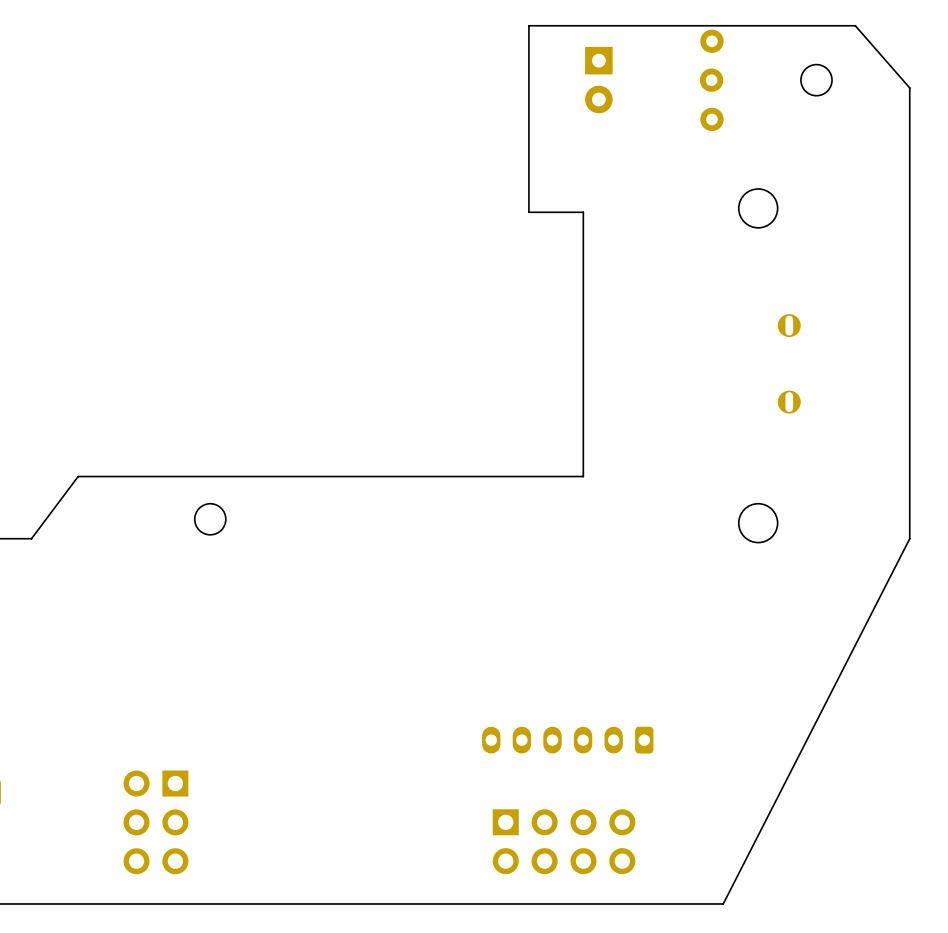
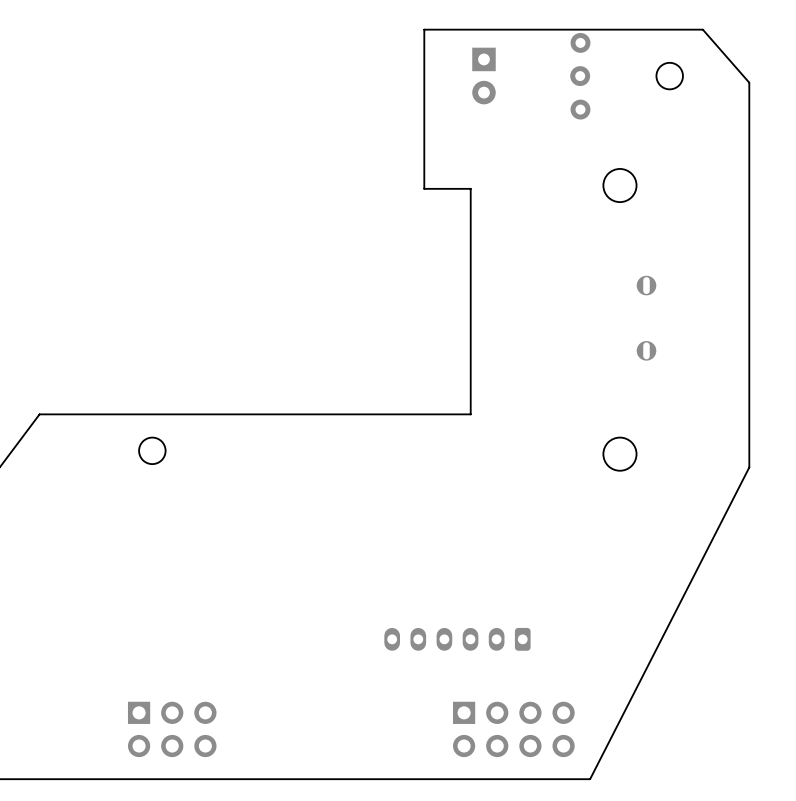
part rotation: 0° (155, 822) -> 90° counterclockwise (172, 729)
part position: (155, 822) -> (172, 729)
part position: (564, 841) -> (513, 729)

